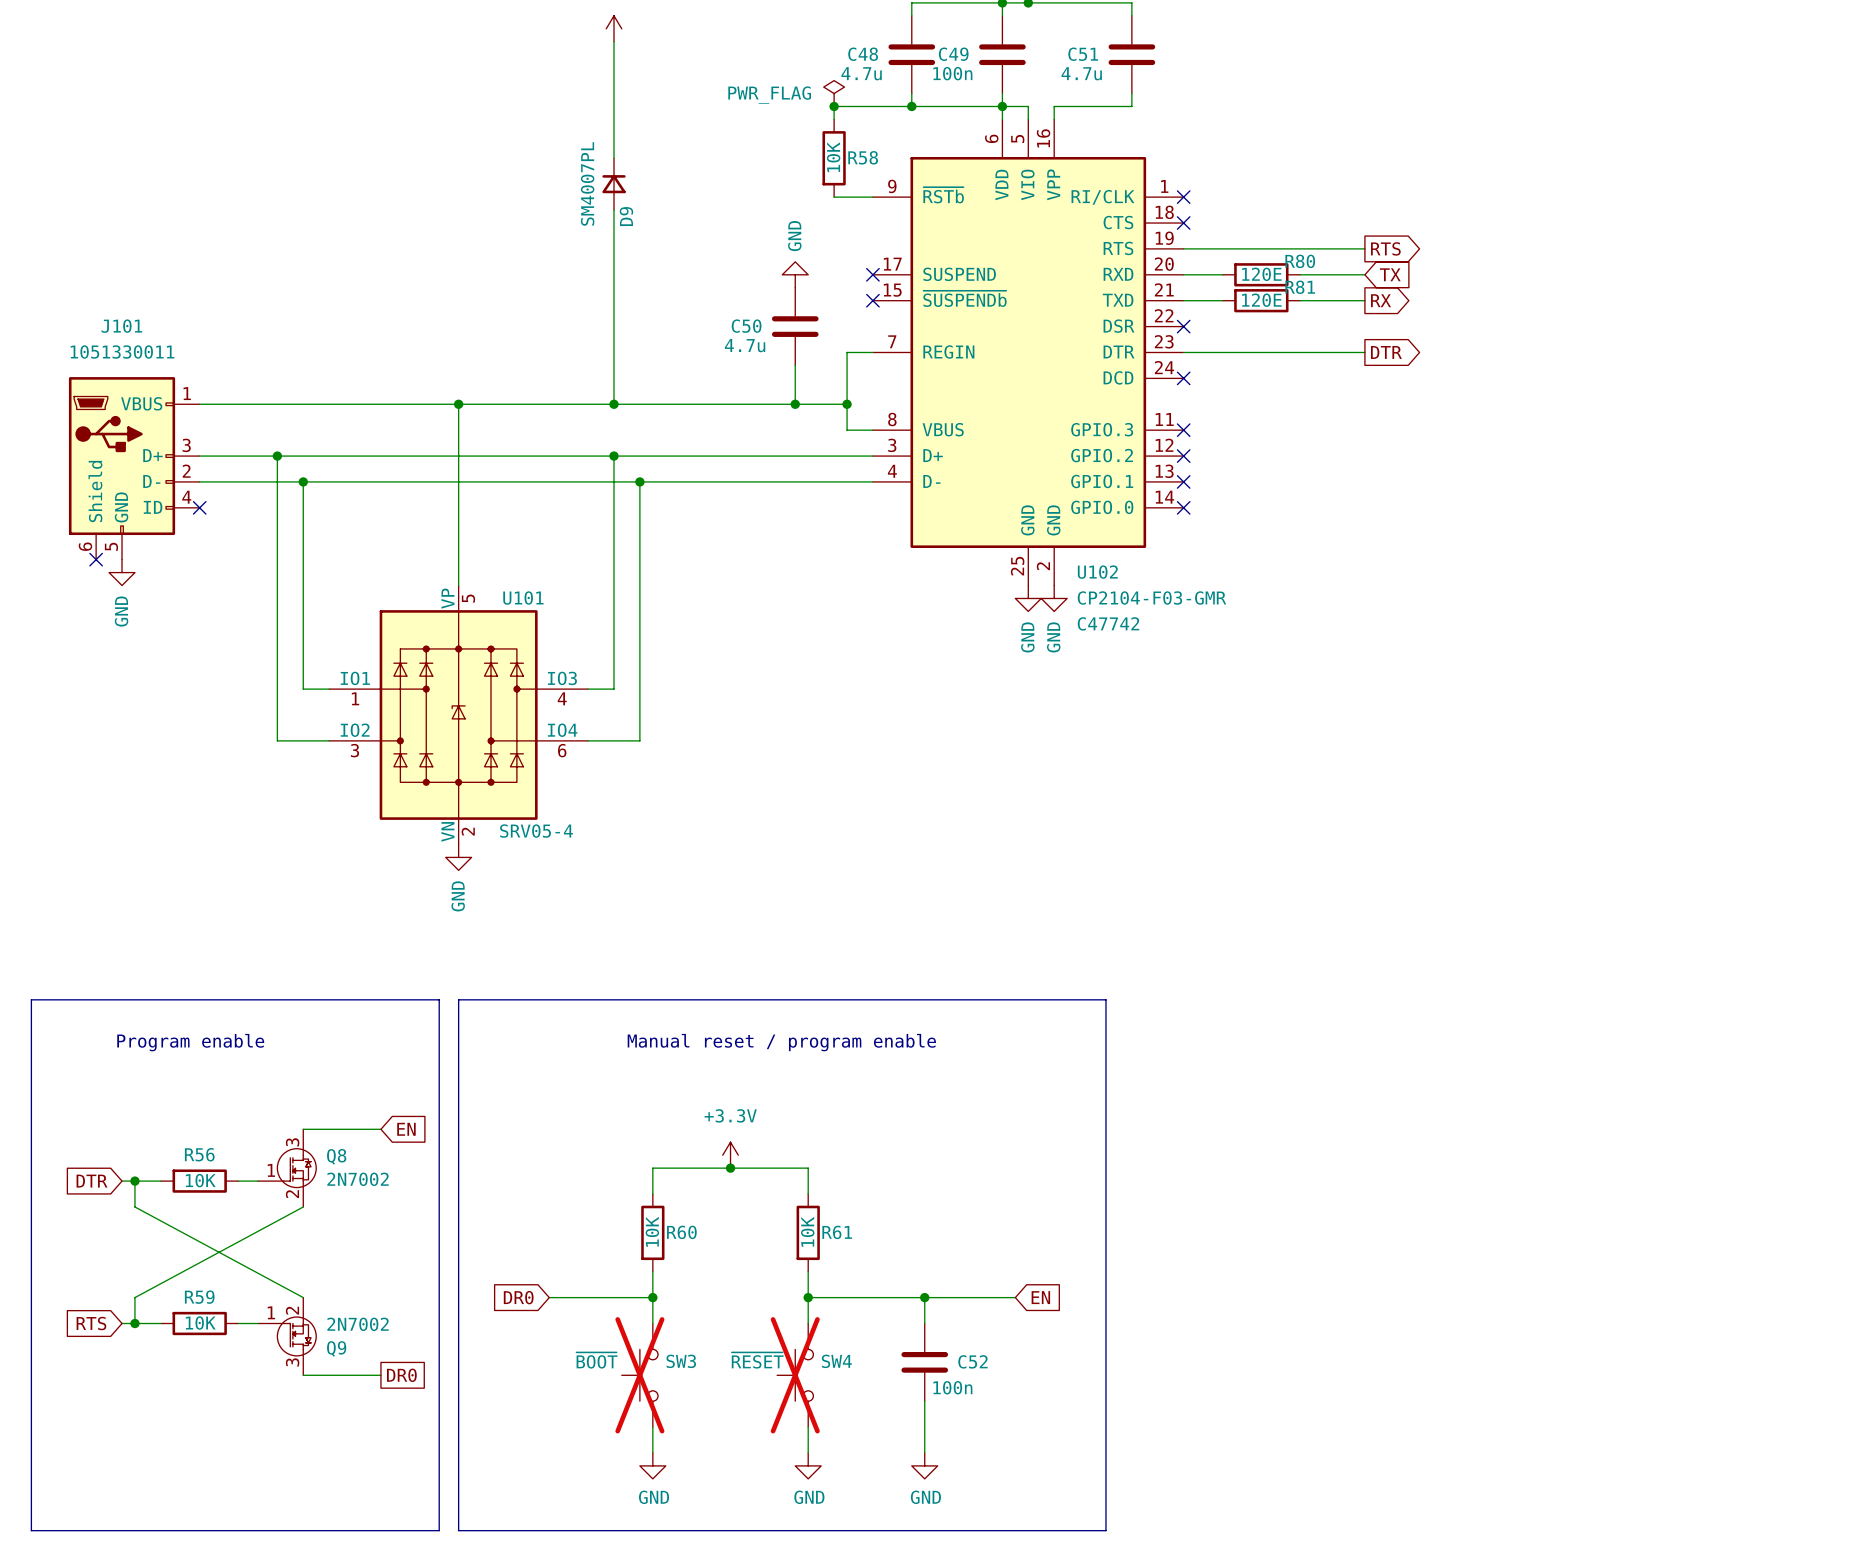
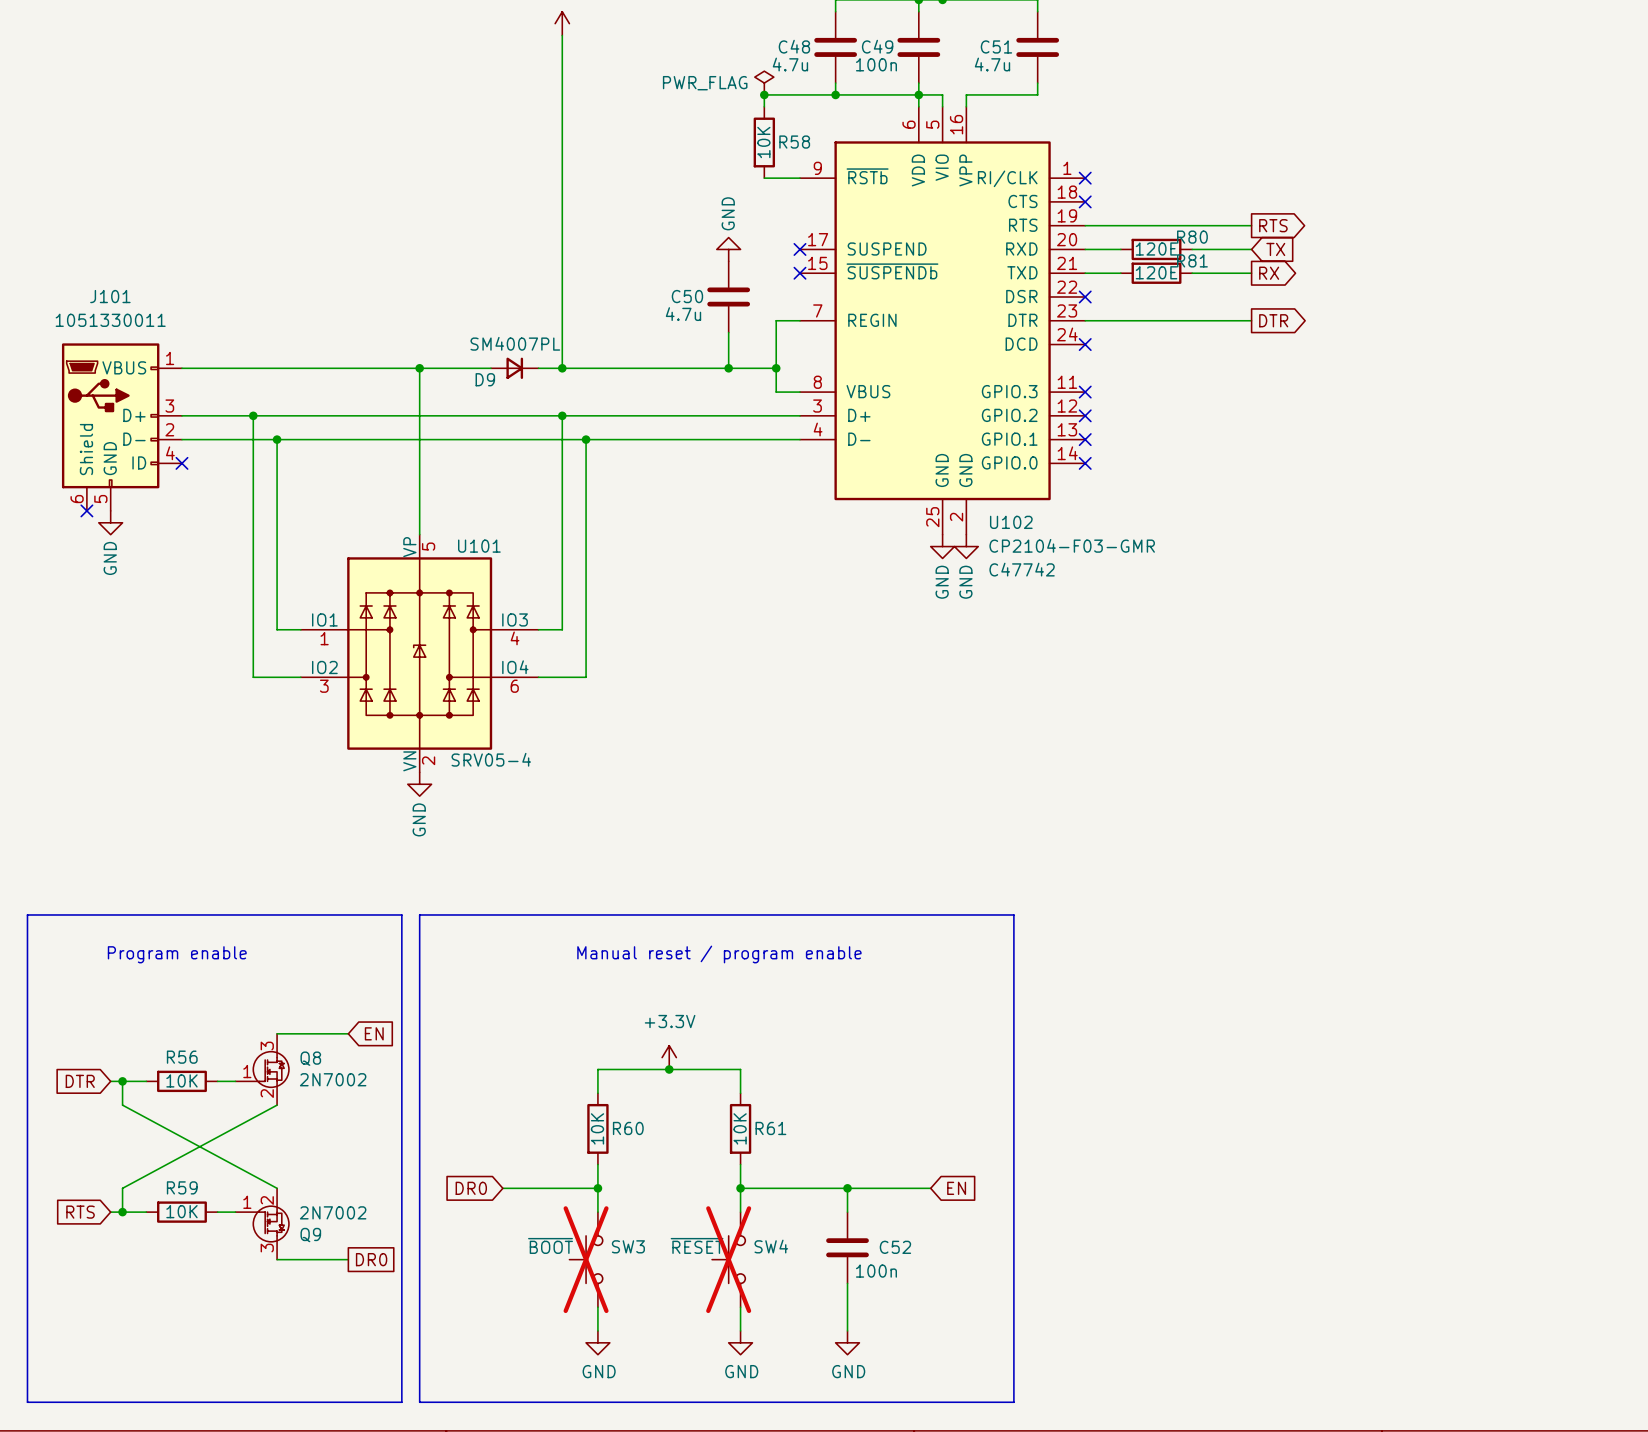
D9 rotation: 0° (614, 184) -> 90° clockwise (514, 368)
D9 position: (614, 184) -> (514, 368)

